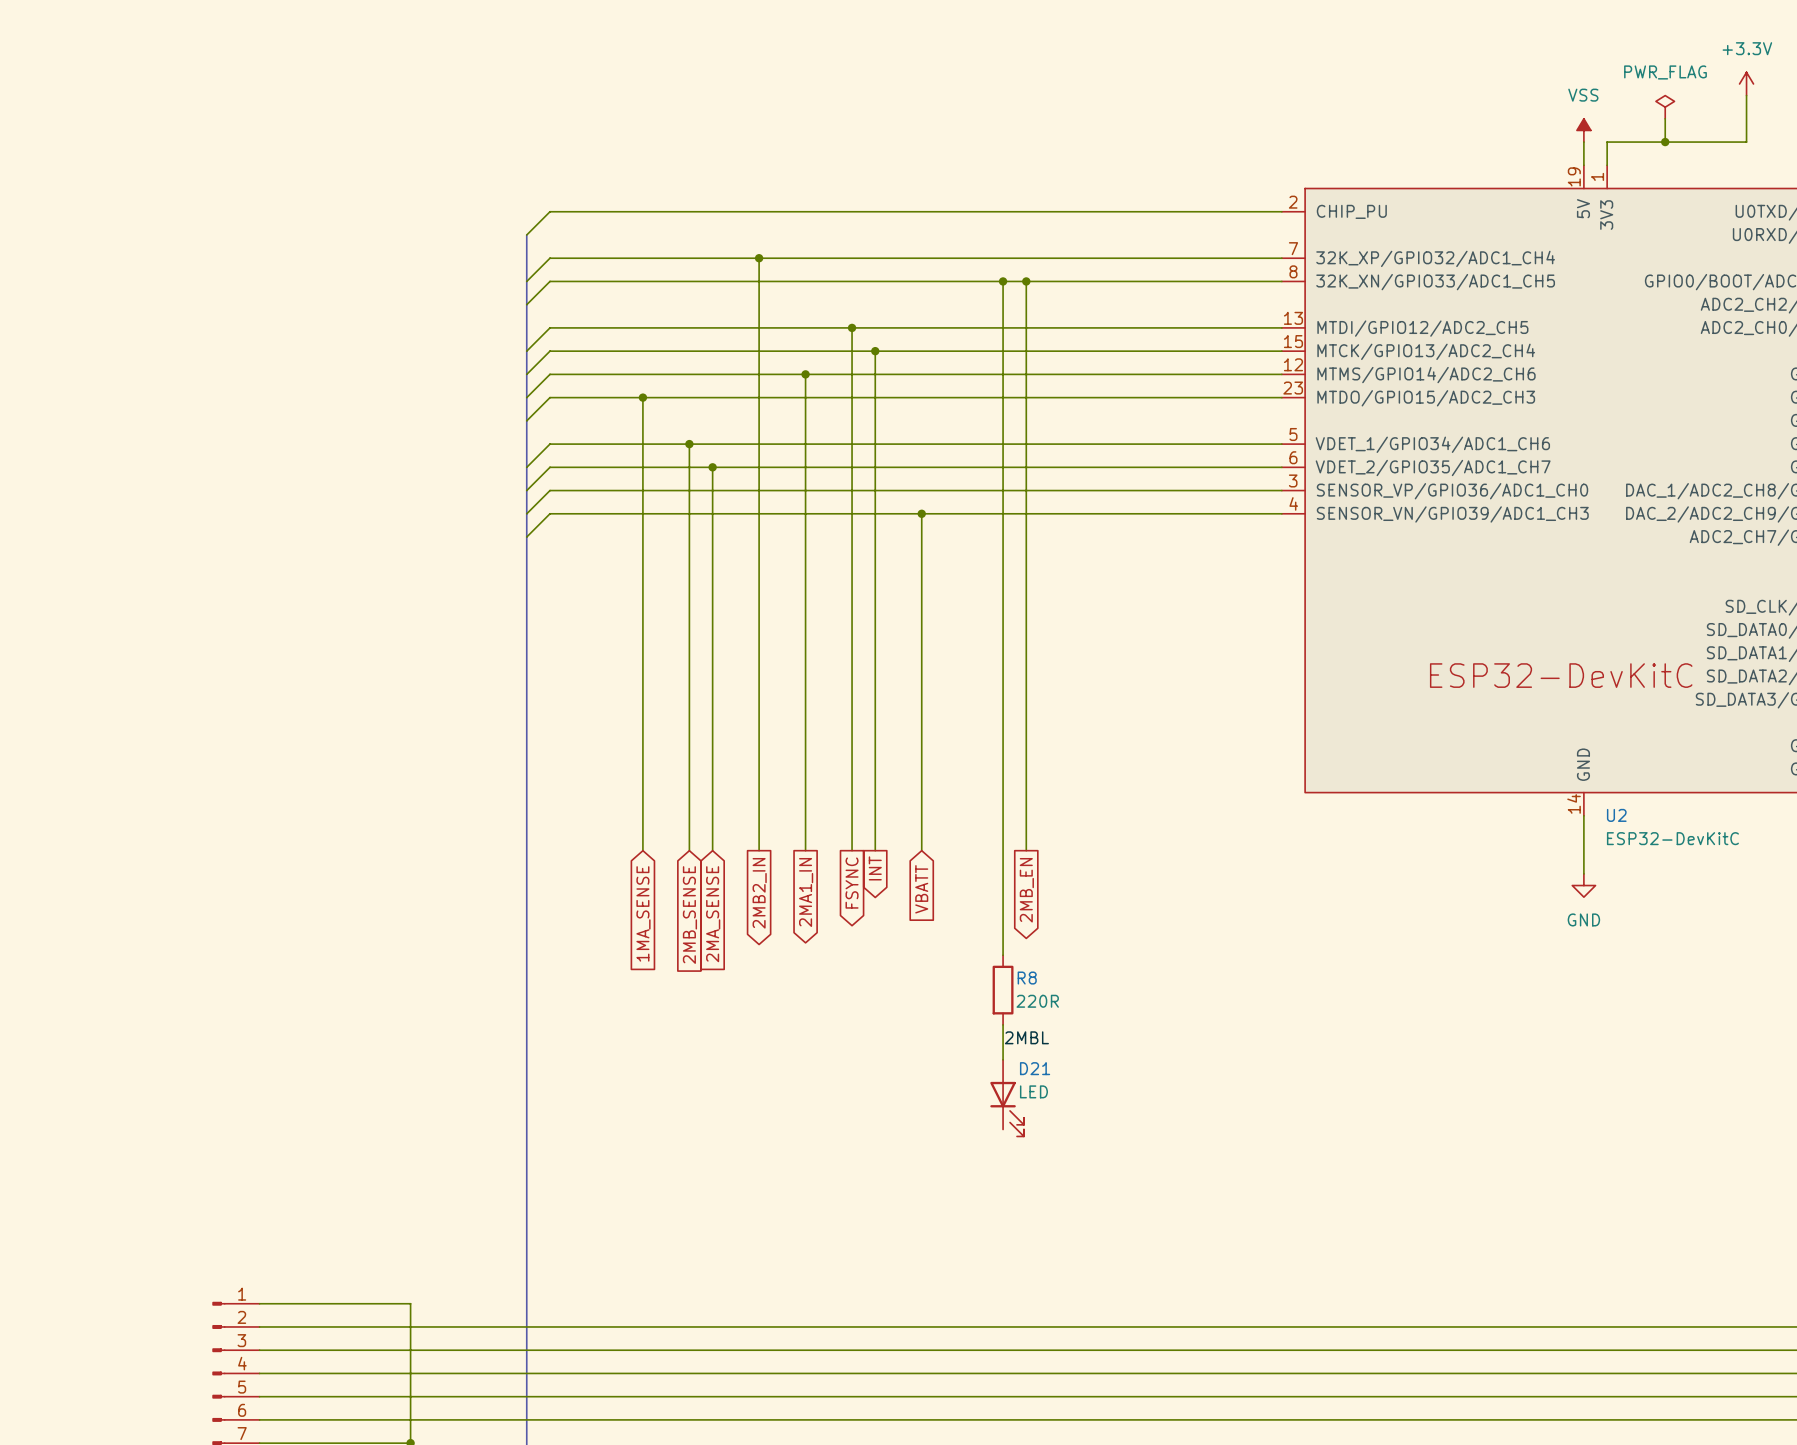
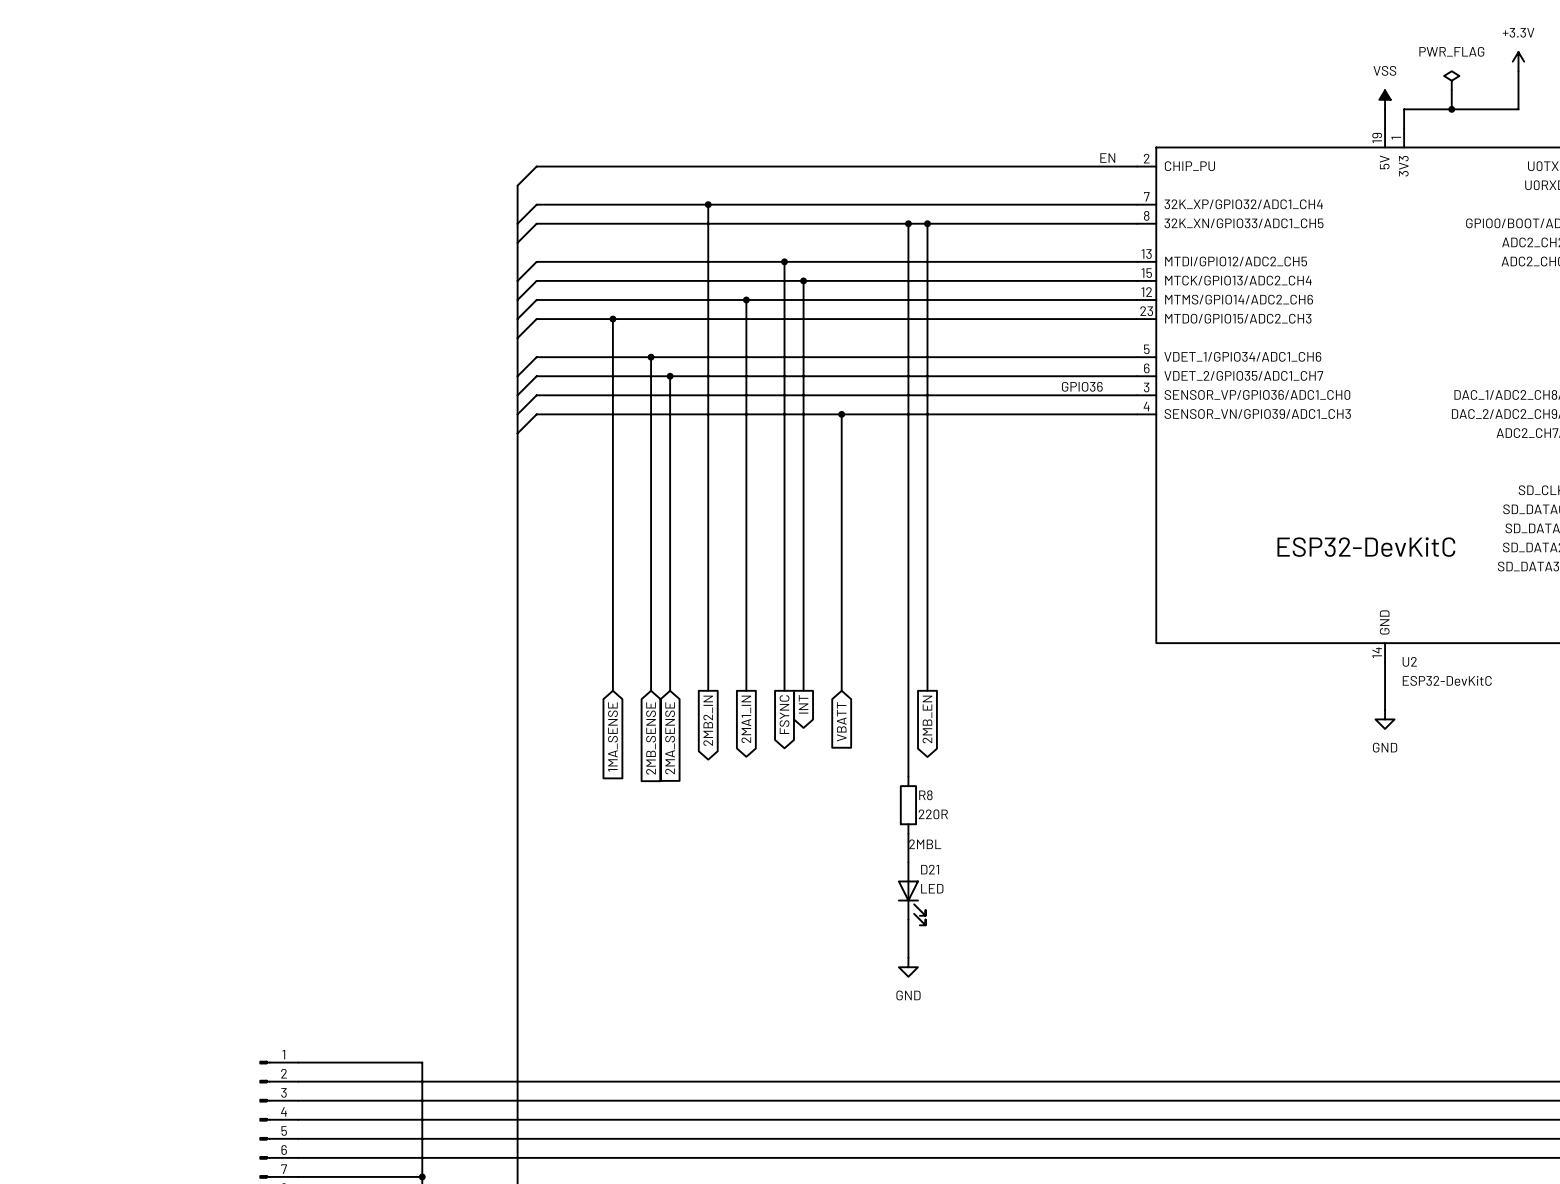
label: none -> EN (1107, 158)
label: none -> GPIO36 (1082, 386)
wire: none -> (908, 919) (908, 957)
power symbol: none -> GND (908, 967)

